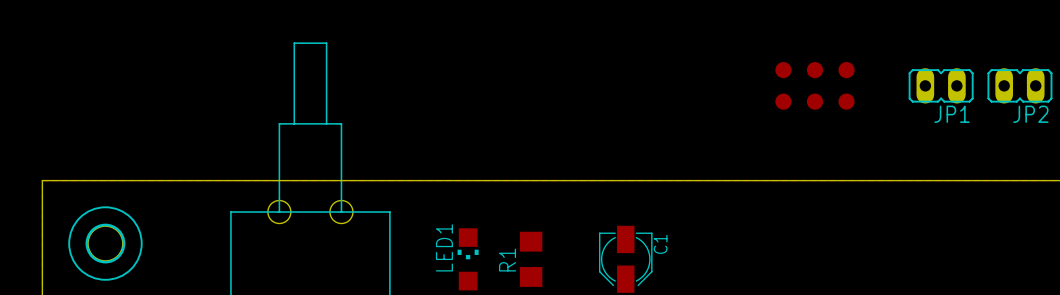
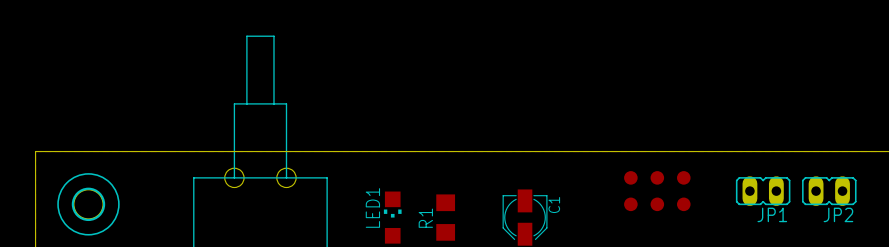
part: (783, 70) -> none
part: (814, 70) -> none
part: (846, 70) -> none
JP1 position: (941, 85) -> (763, 191)
JP2 position: (1019, 85) -> (829, 191)
part: (783, 101) -> none
part: (814, 101) -> none
part: (846, 101) -> none
part: none -> (630, 177)
part: none -> (657, 177)
part: none -> (683, 177)
part: none -> (630, 204)
part: none -> (657, 204)
part: none -> (683, 204)

